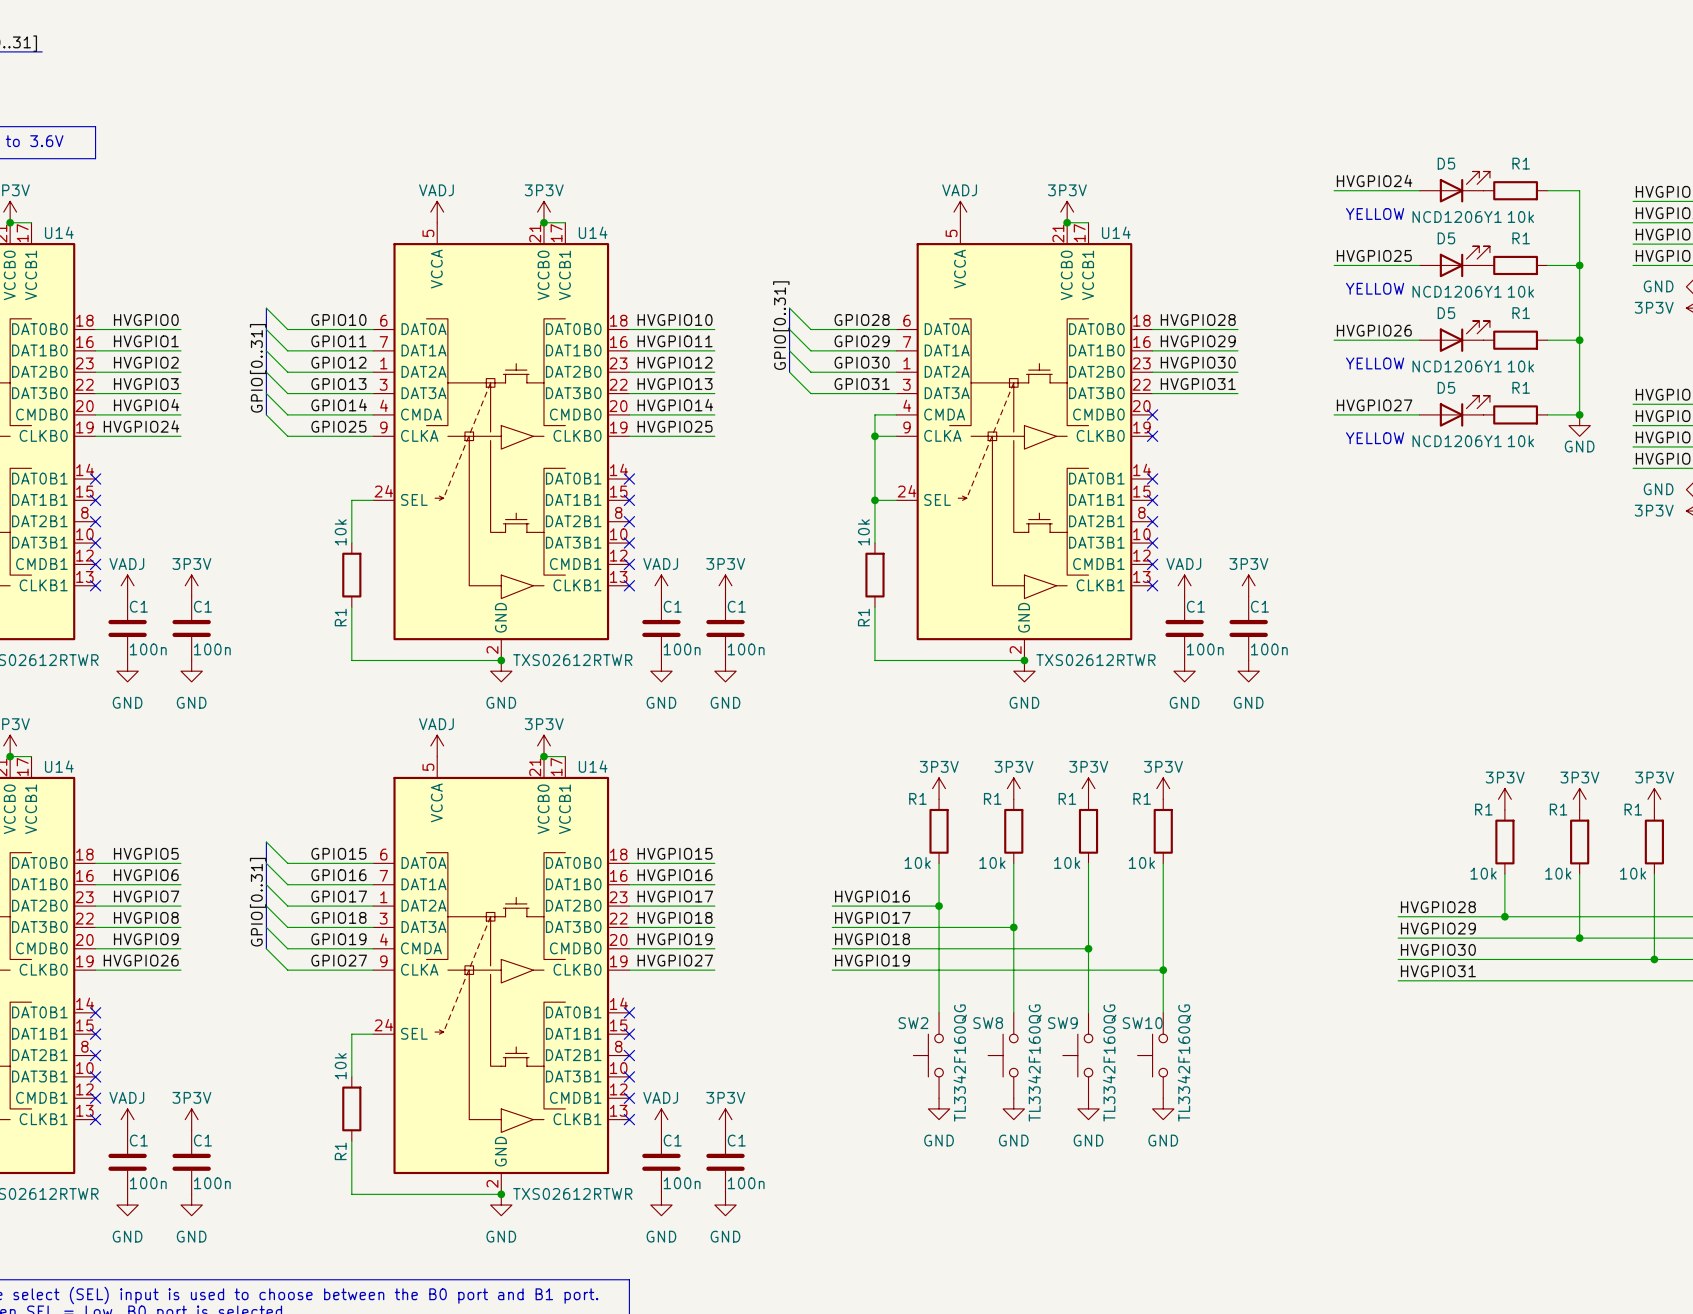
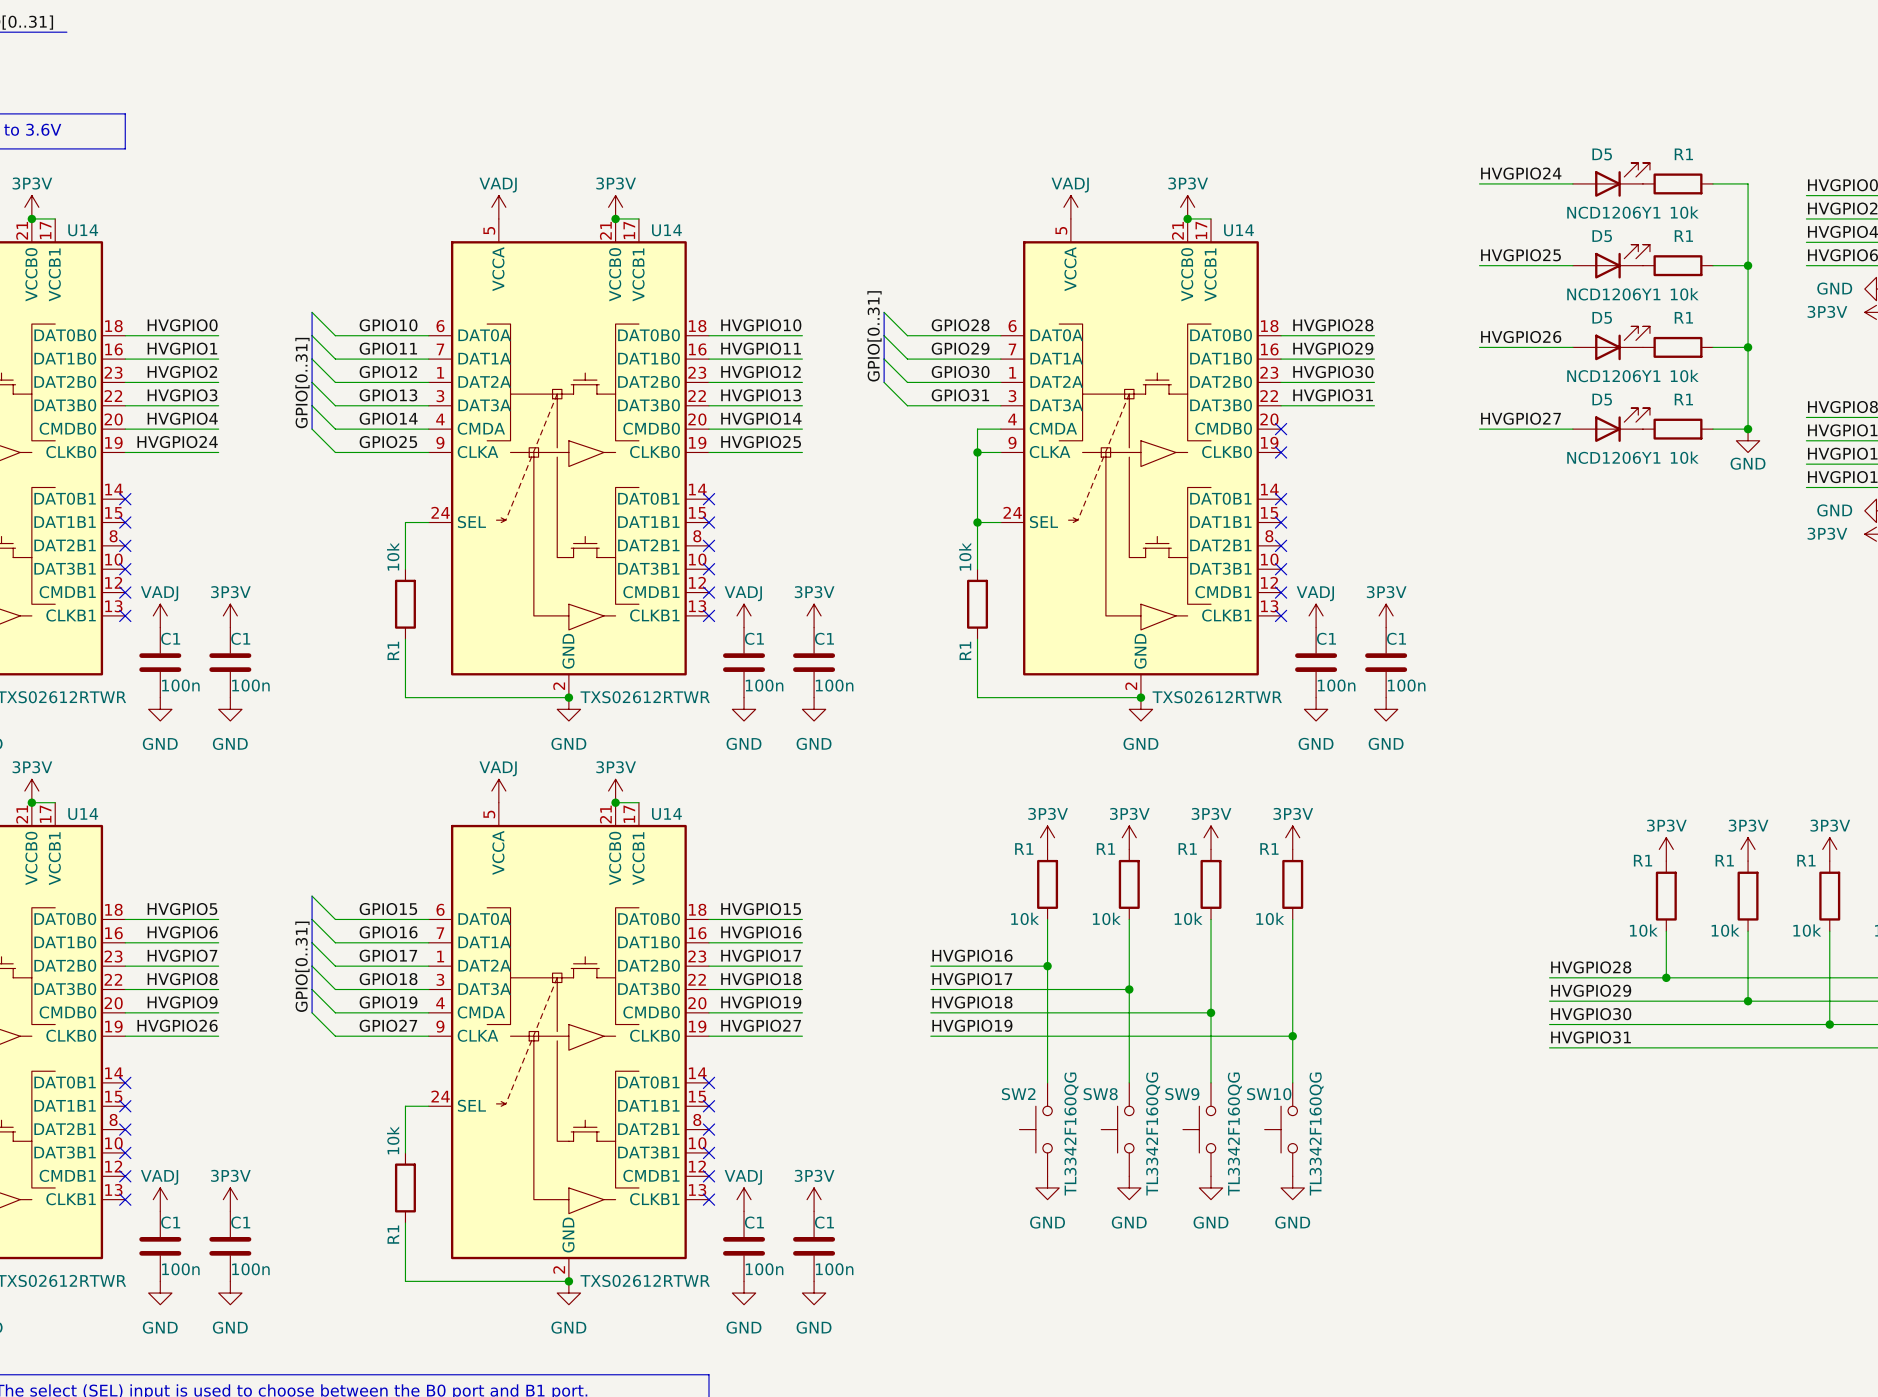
text: YELLOW (1375, 214) -> none
text: YELLOW (1375, 288) -> none
text: YELLOW (1375, 363) -> none
text: YELLOW (1375, 438) -> none

